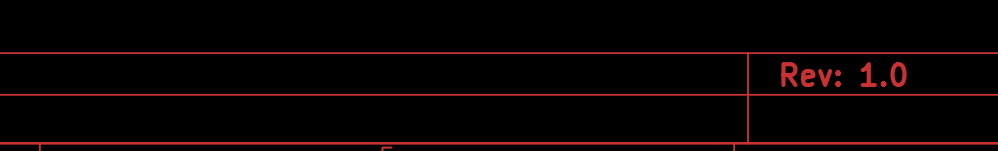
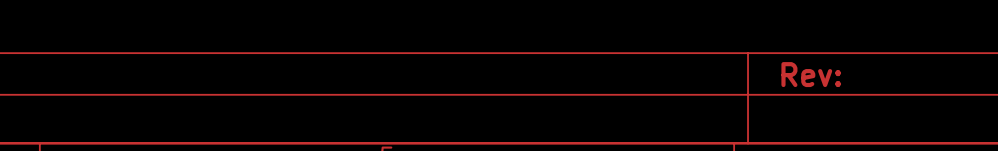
title block: Rev: 1.0 (843, 74) -> Rev: (811, 74)

